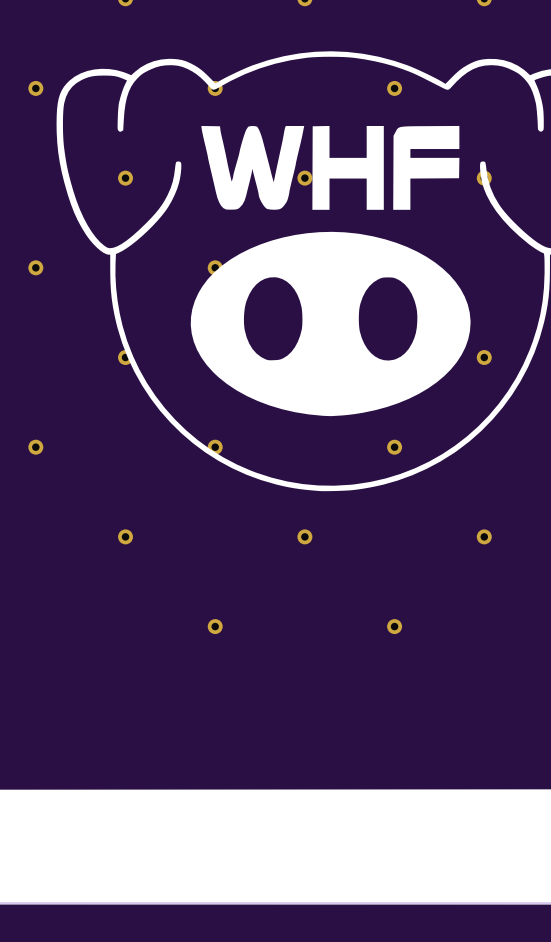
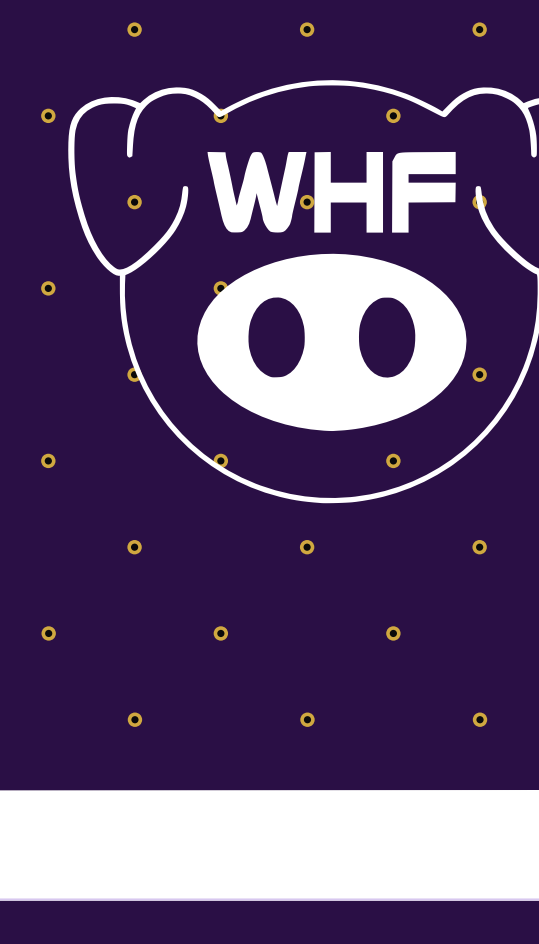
via: none -> (48, 633)
via: none -> (134, 719)
via: none -> (307, 719)
via: none -> (480, 719)

